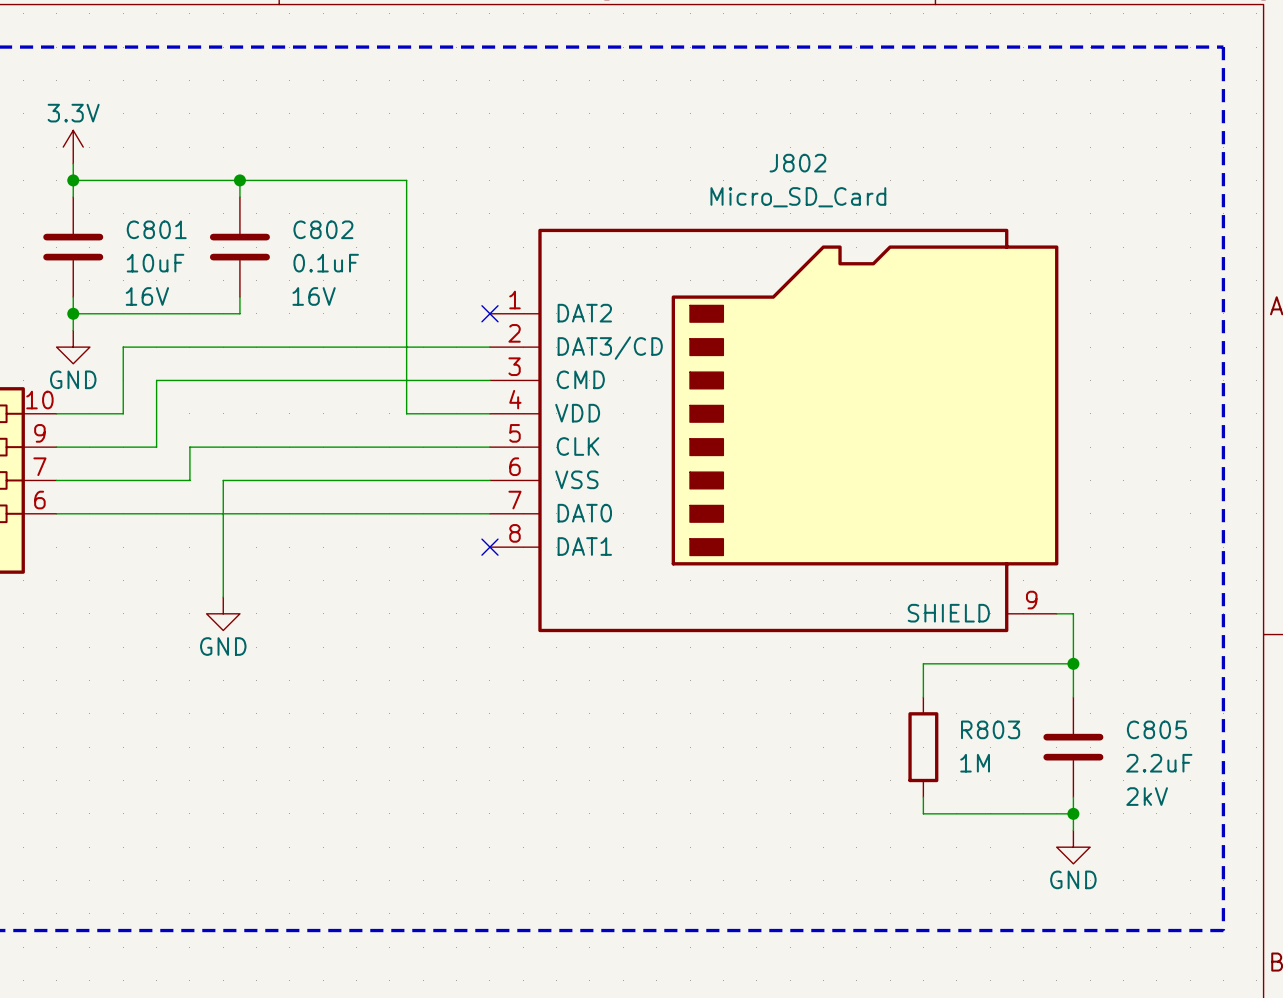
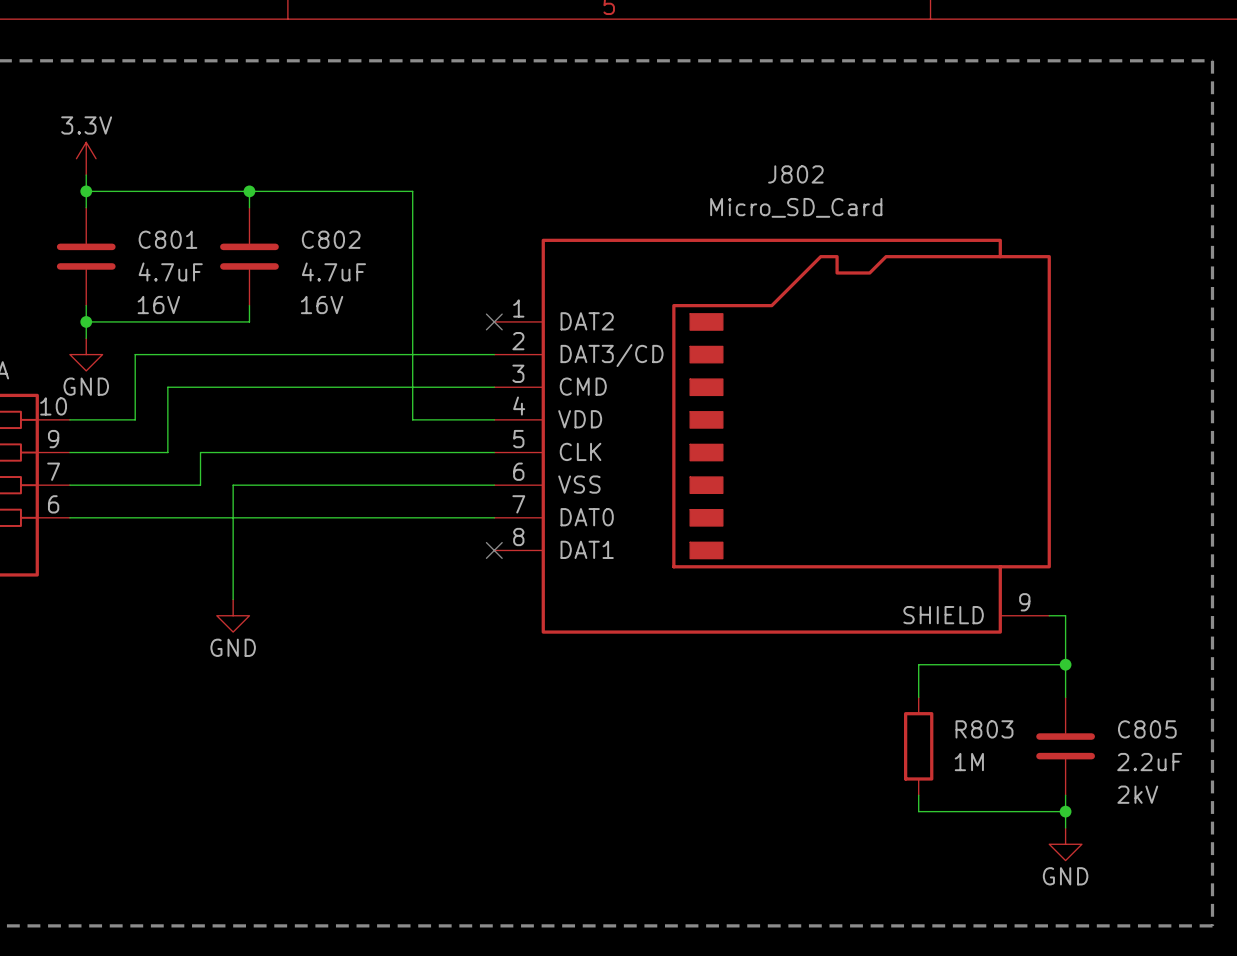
C801 value: 10uF (155, 263) -> 4.7uF (170, 271)
C802 value: 0.1uF (326, 263) -> 4.7uF (333, 271)

